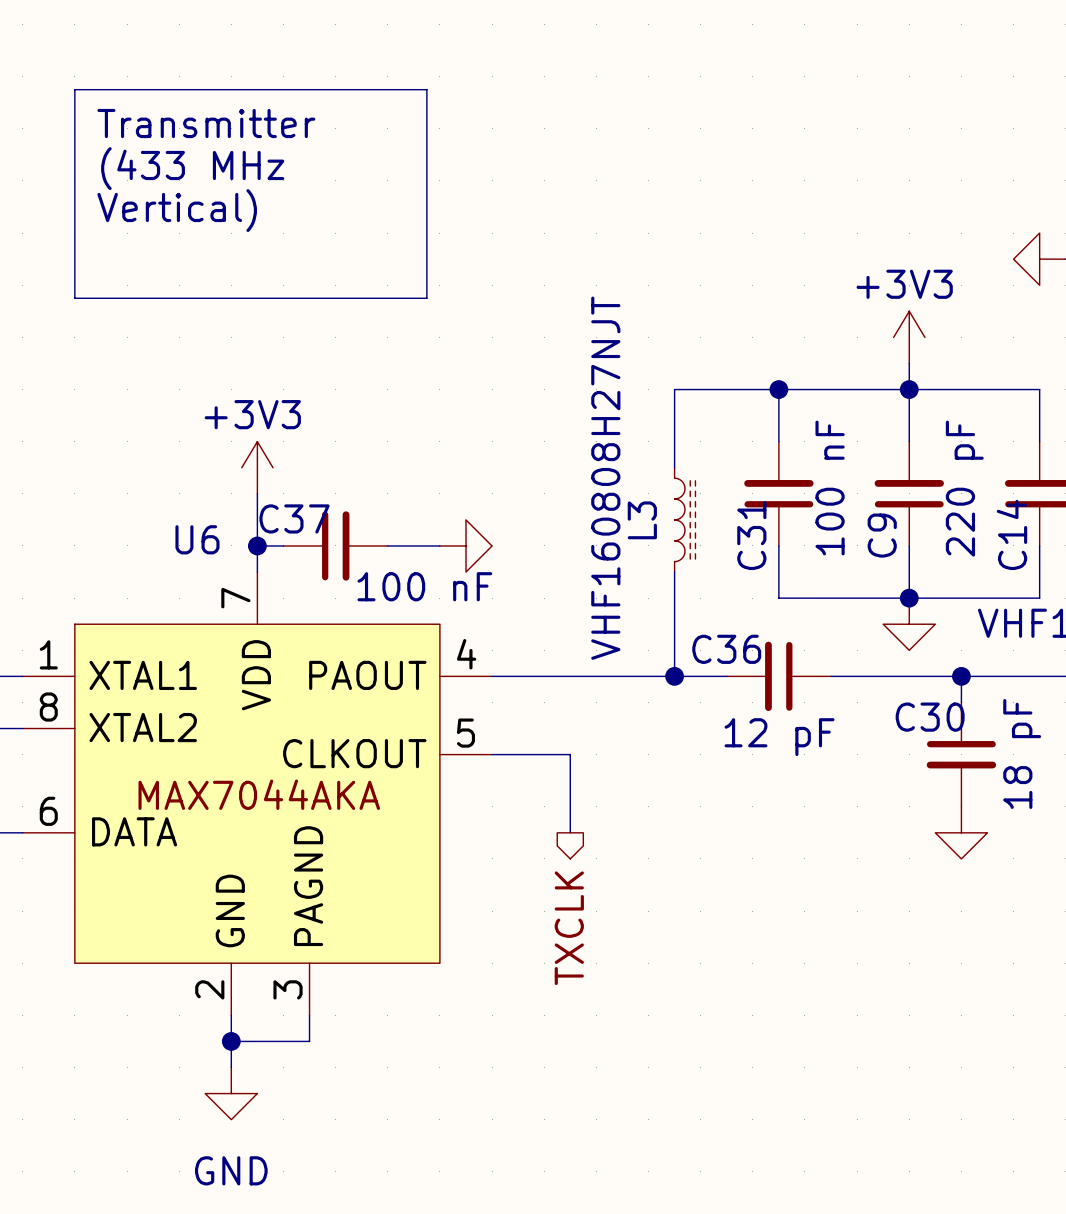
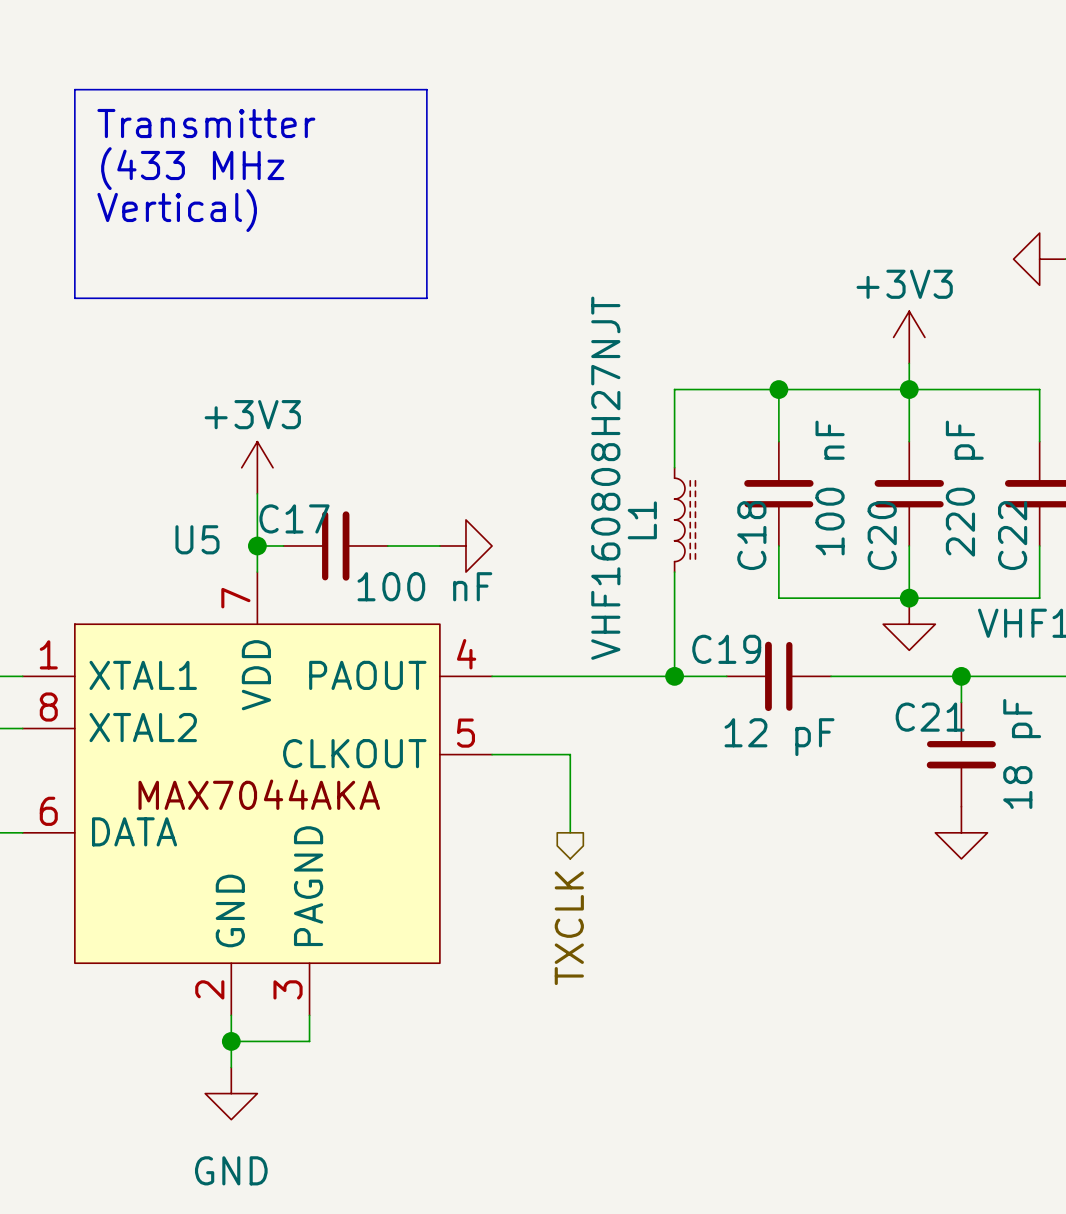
C37 name: C37 (294, 518) -> C17 (294, 518)
L3 name: L3 (642, 520) -> L1 (642, 520)
C14 name: C14 (1011, 534) -> C22 (1012, 535)
C31 name: C31 (751, 535) -> C18 (751, 535)
C9 name: C9 (882, 535) -> C20 (882, 535)
U6 name: U6 (197, 539) -> U5 (197, 539)
C36 name: C36 (726, 649) -> C19 (726, 649)
C30 name: C30 (930, 717) -> C21 (930, 717)

